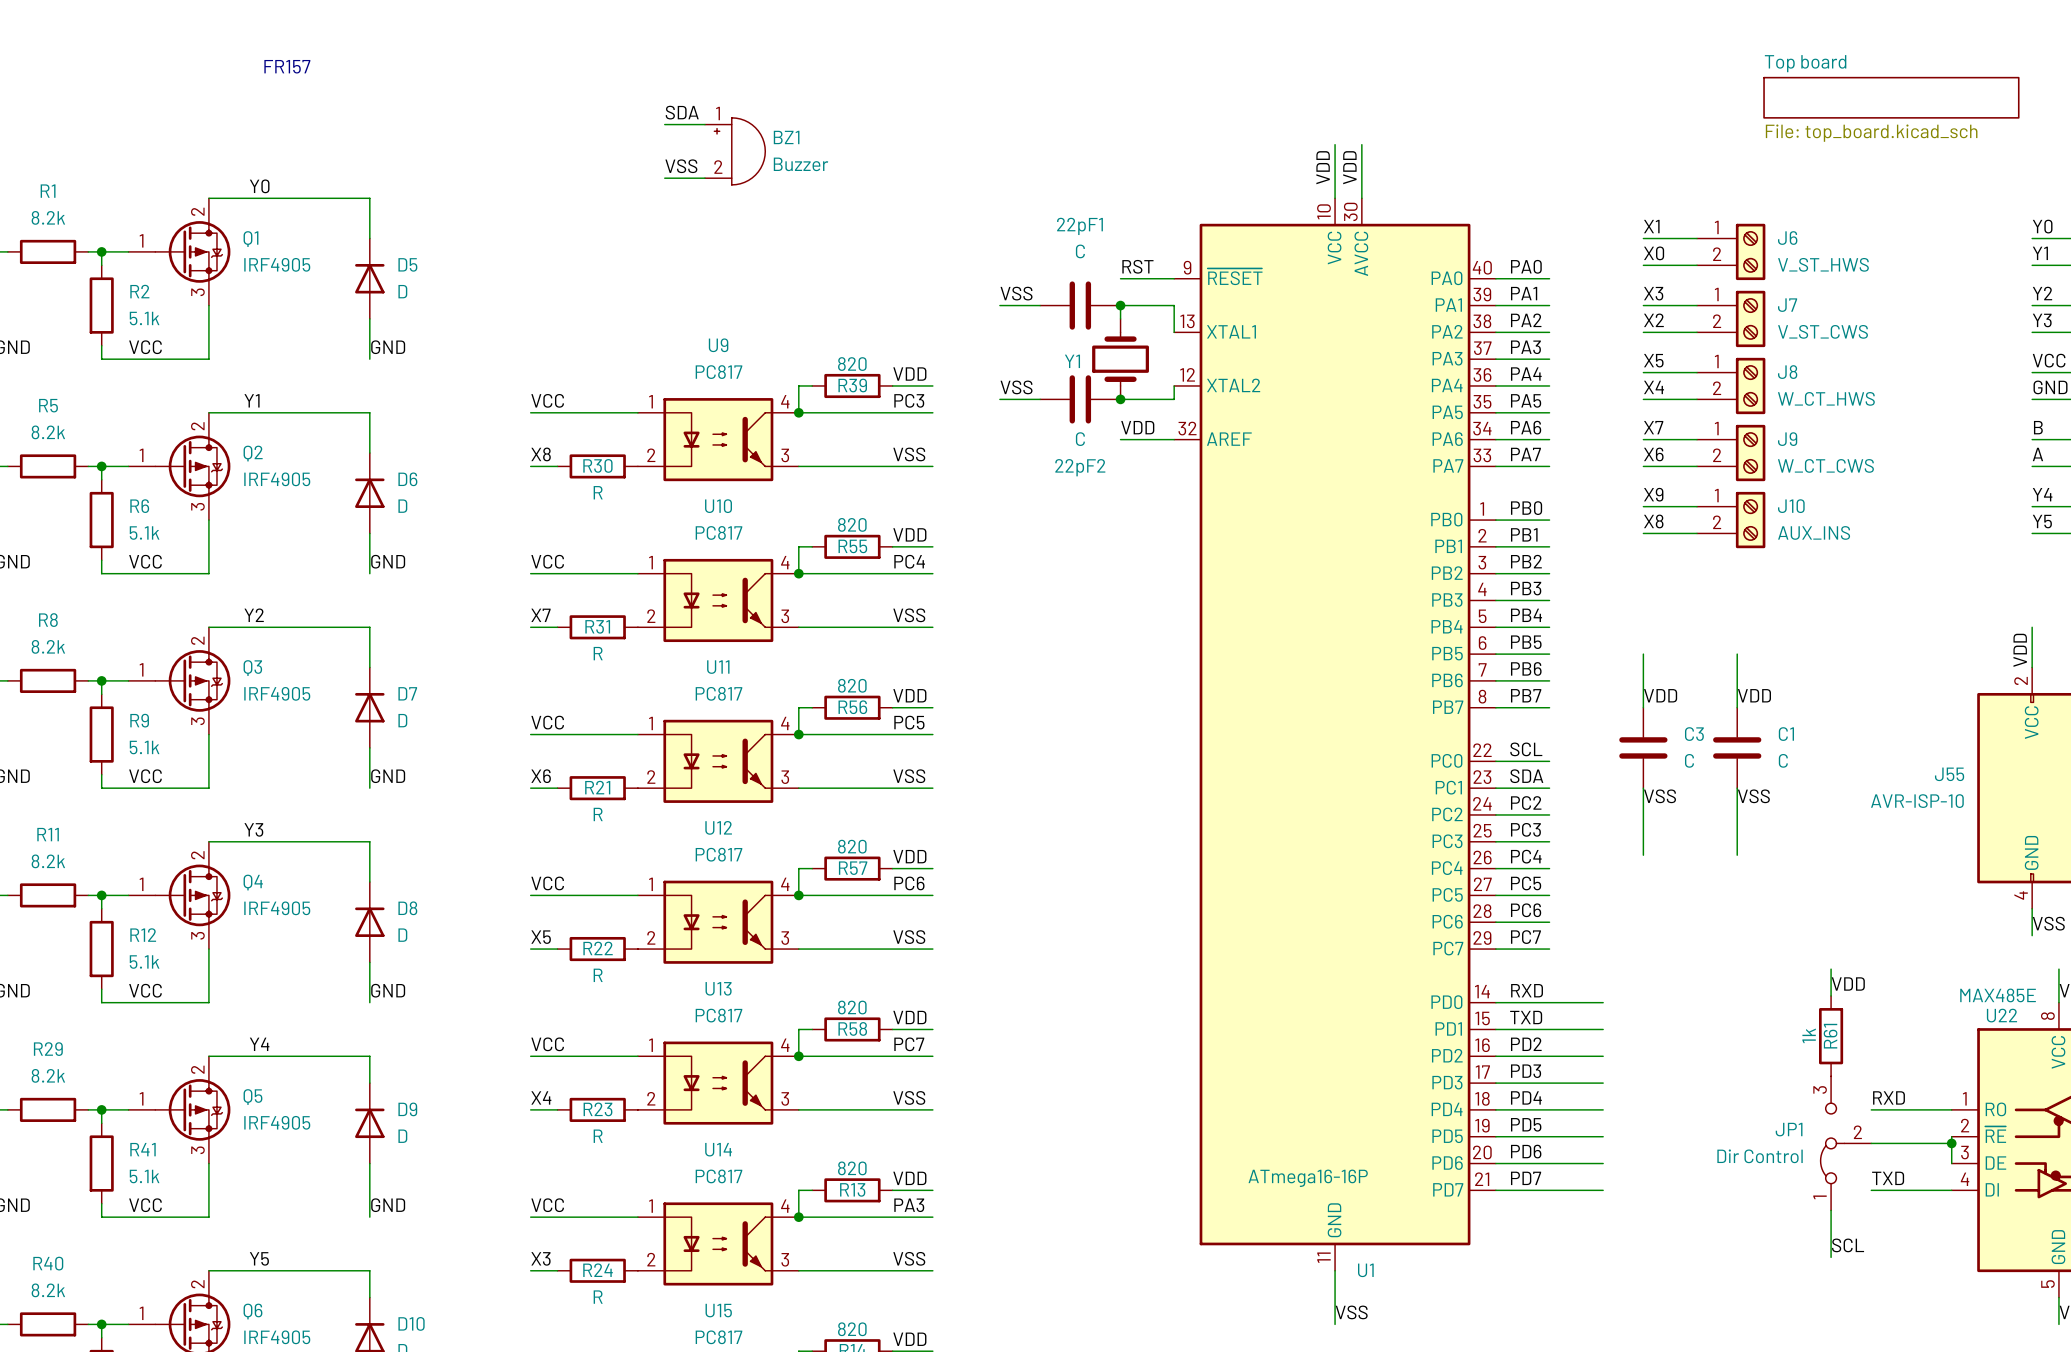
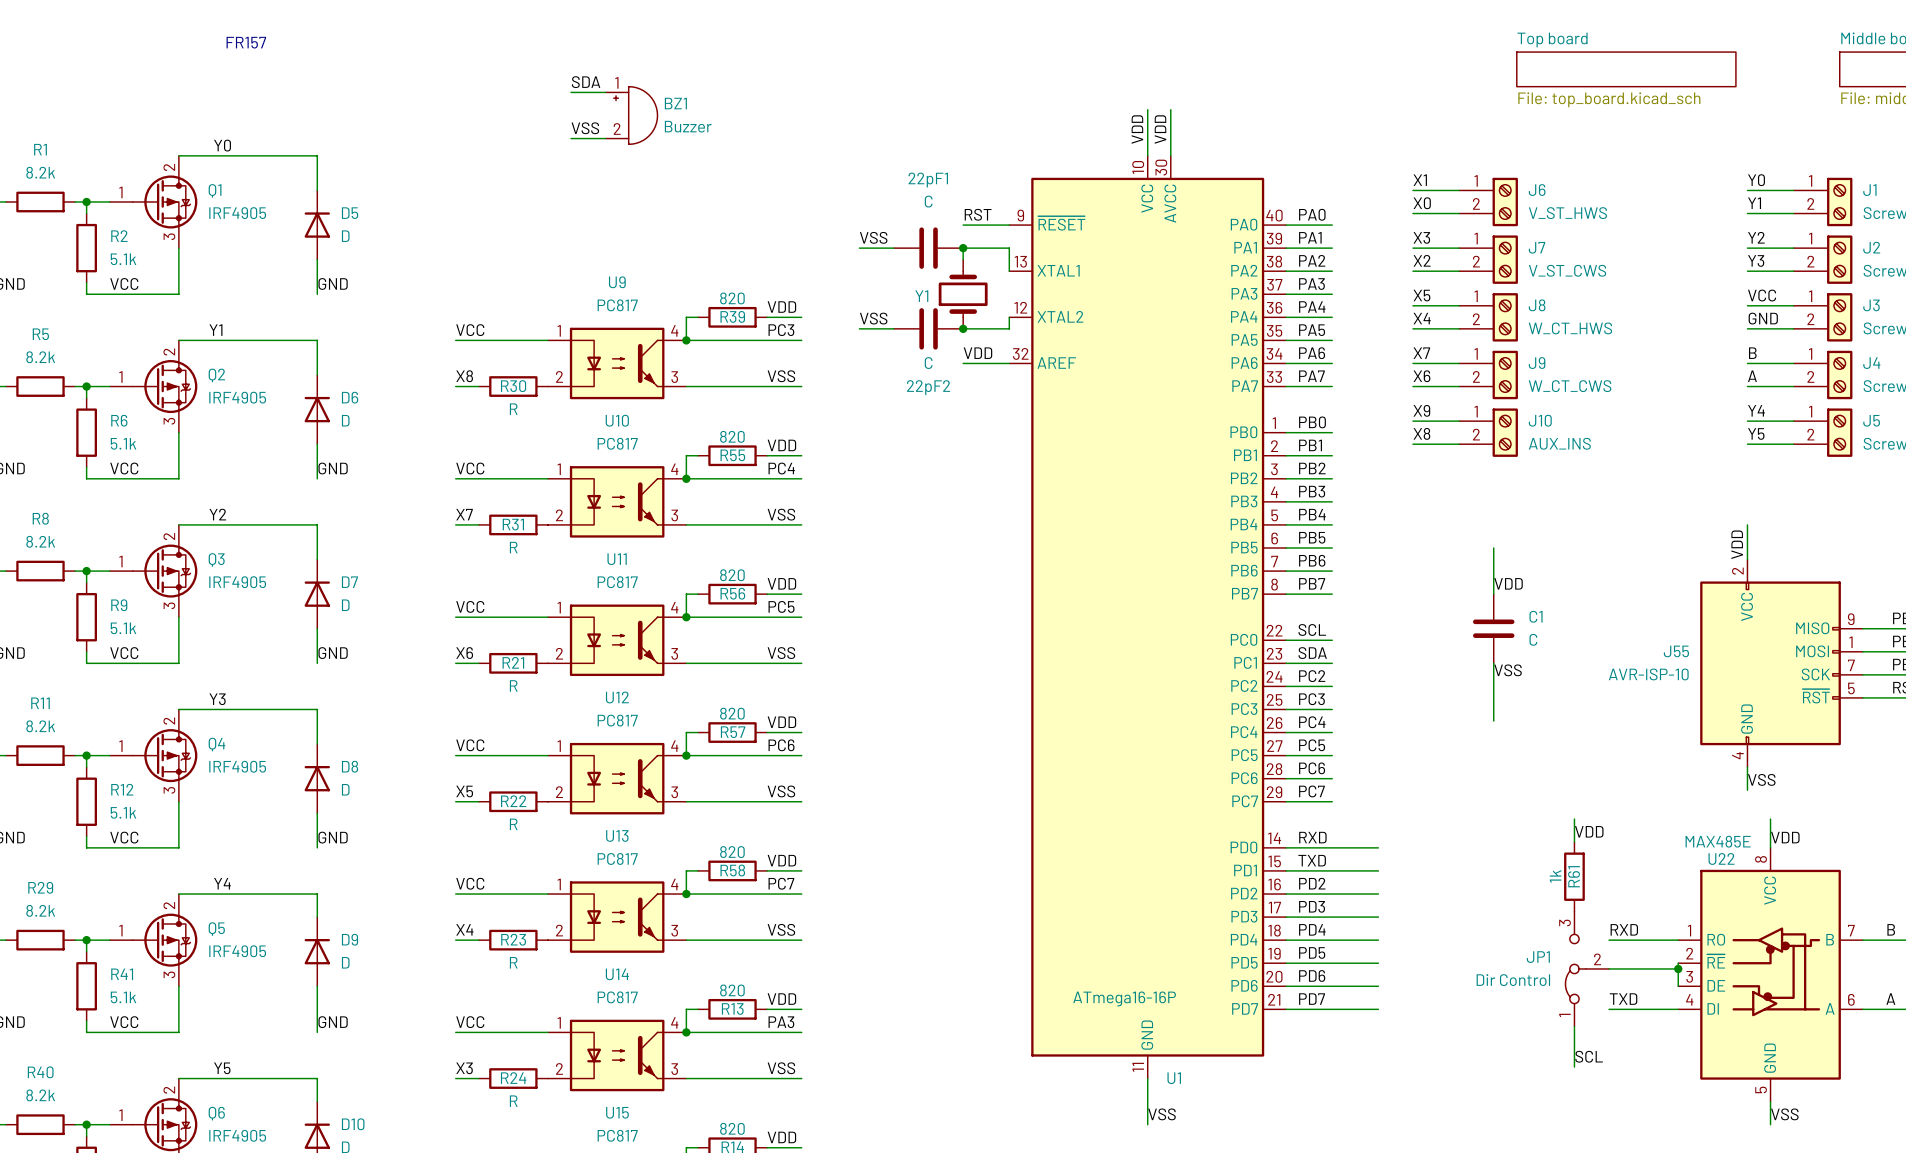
wire: (1643, 654) (1643, 707) -> none
label: VDD (1660, 695) -> none
C3: C (1643, 747) -> none
wire: (1643, 788) (1643, 855) -> none
label: VSS (1660, 796) -> none

